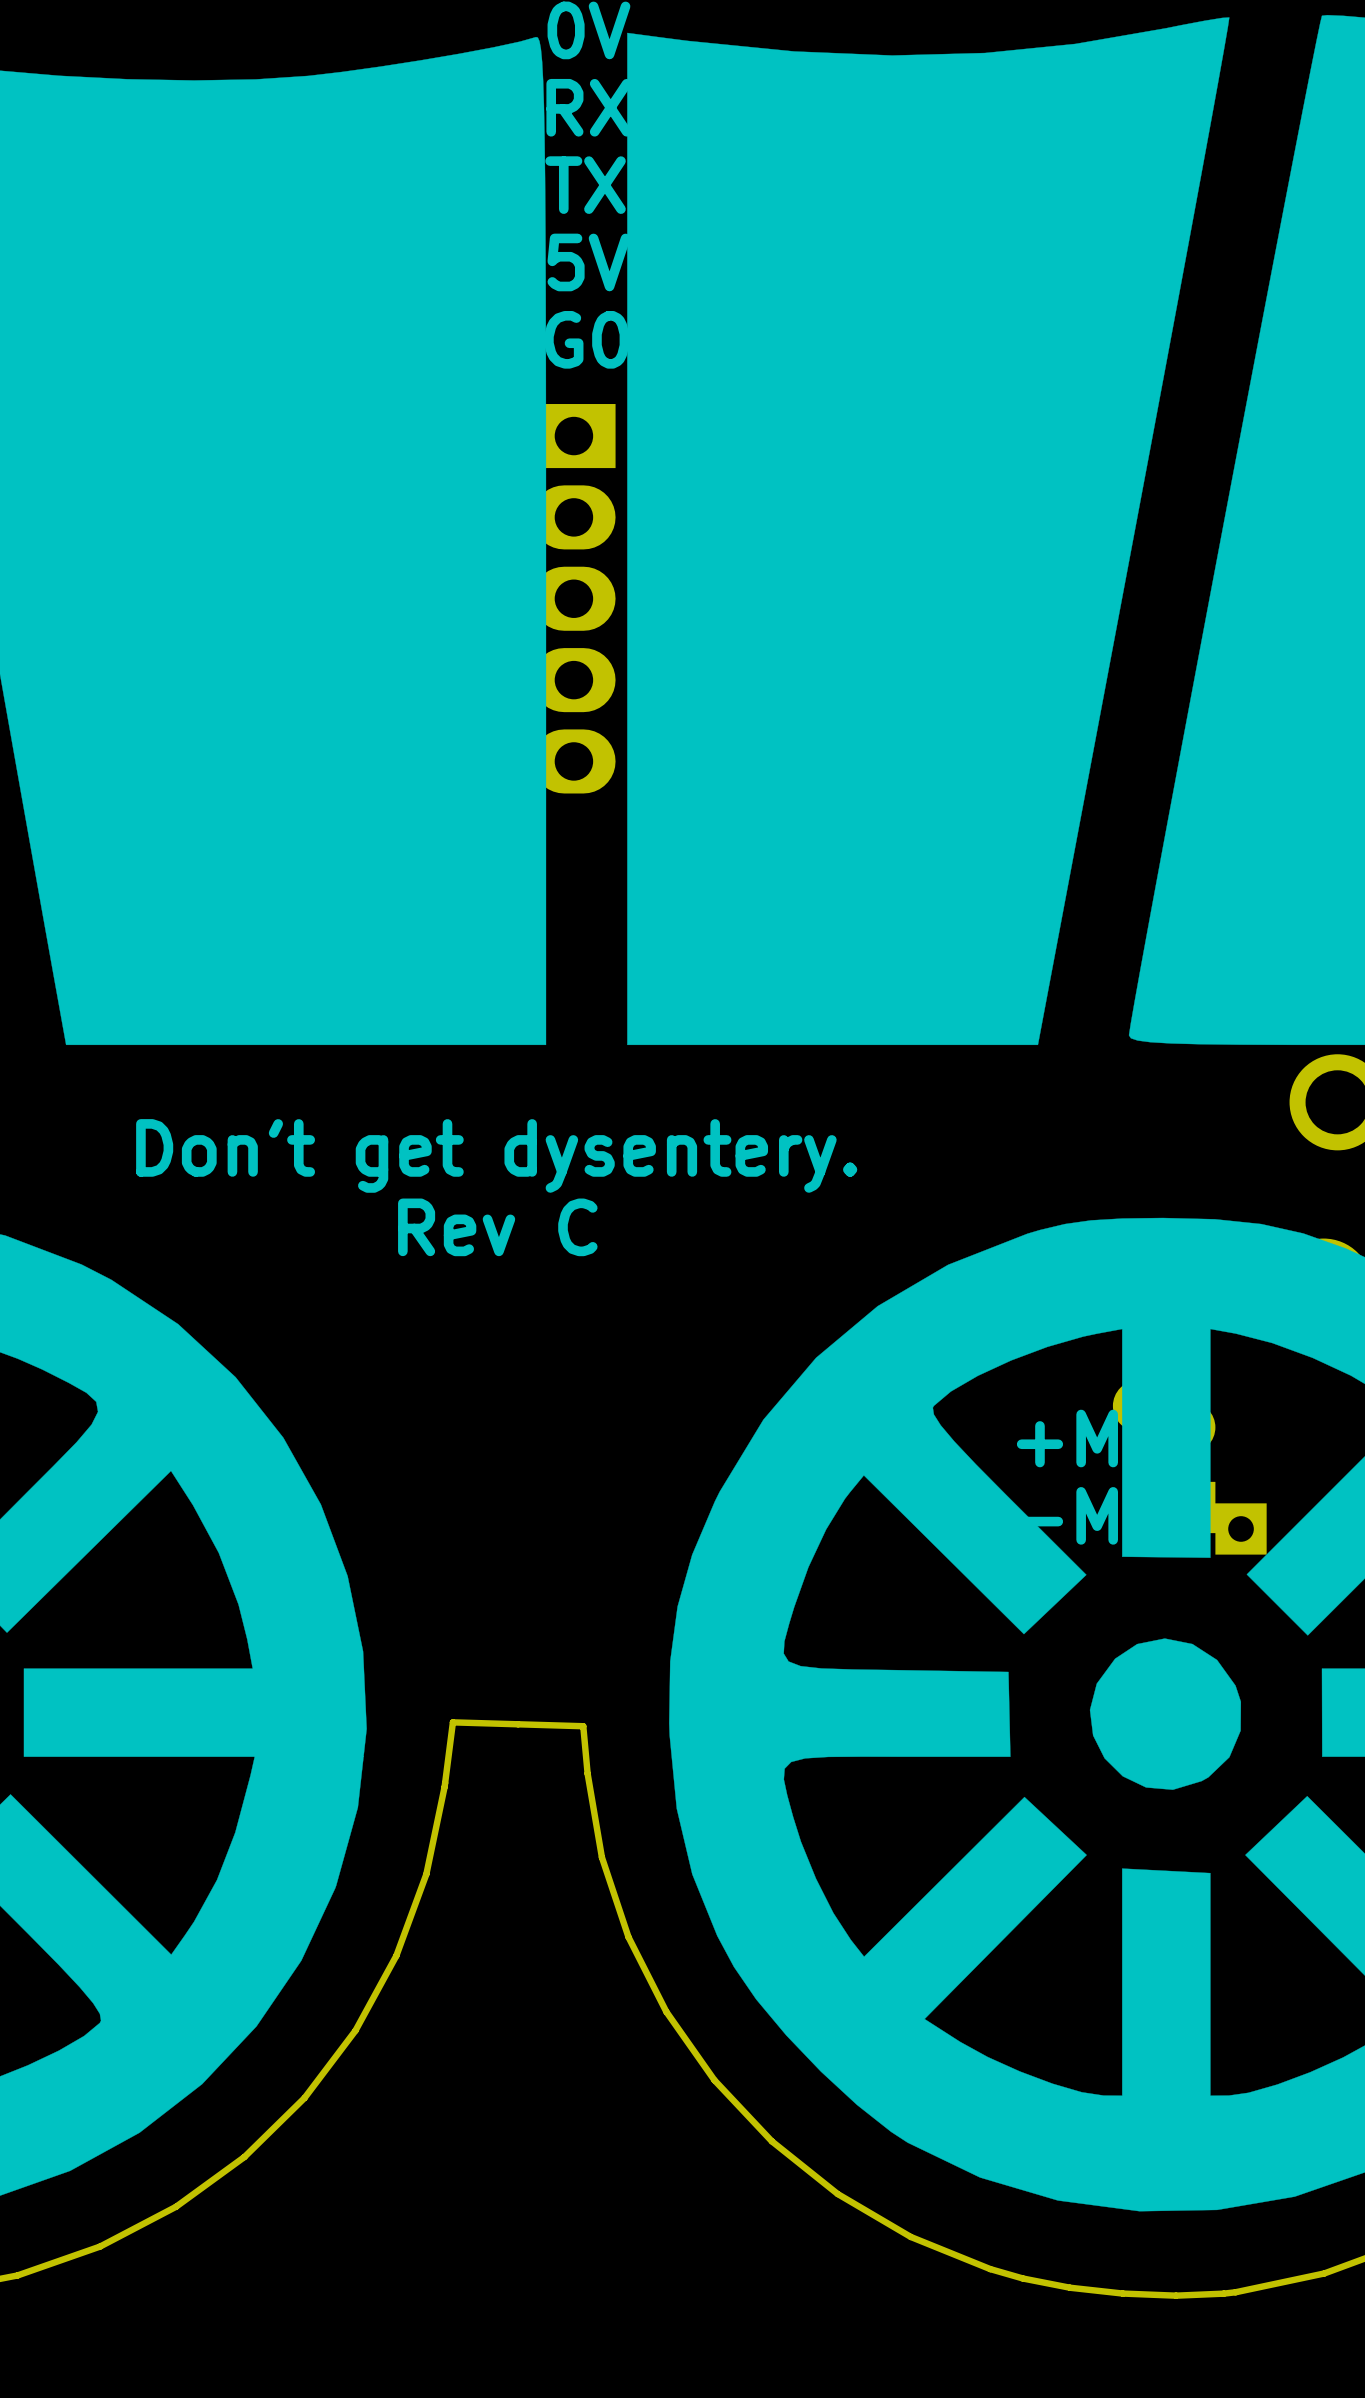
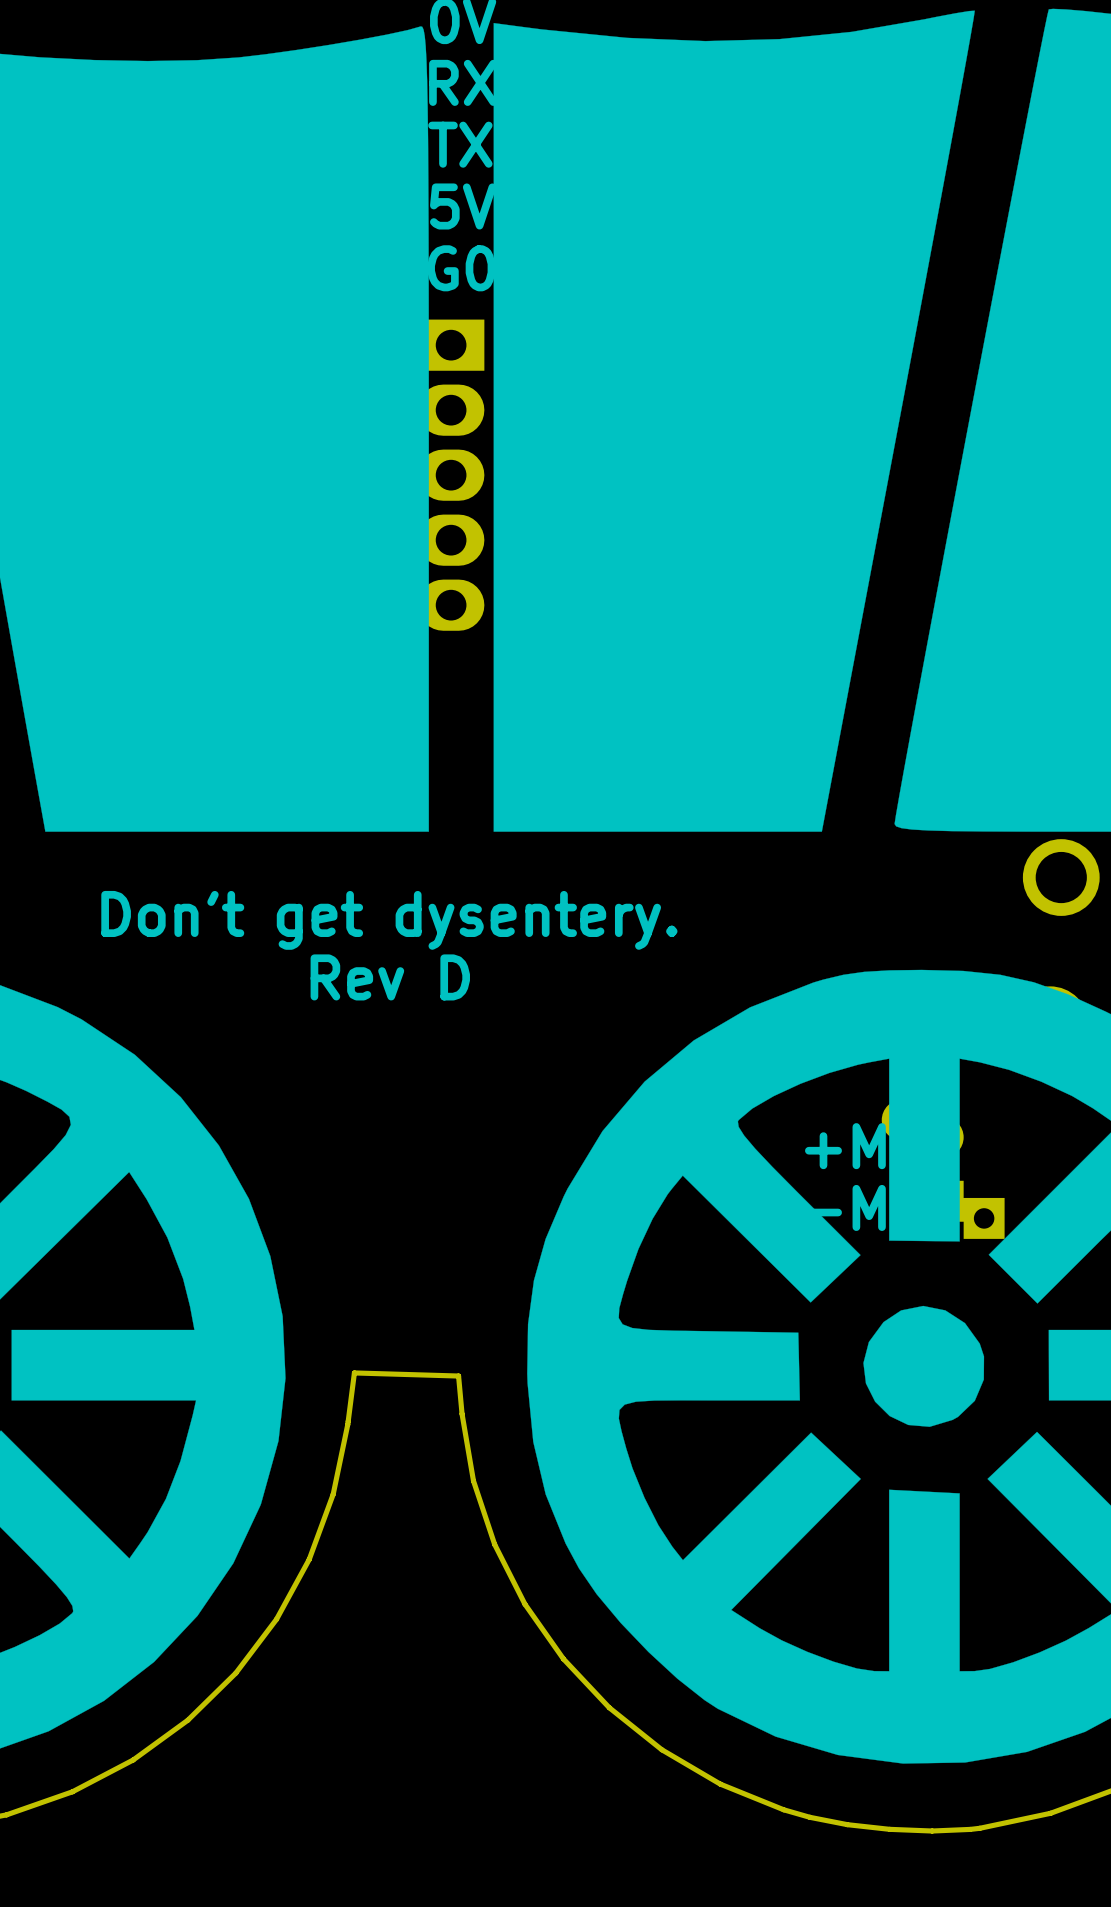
text: Rev C (497, 1227) -> Rev D (390, 977)

